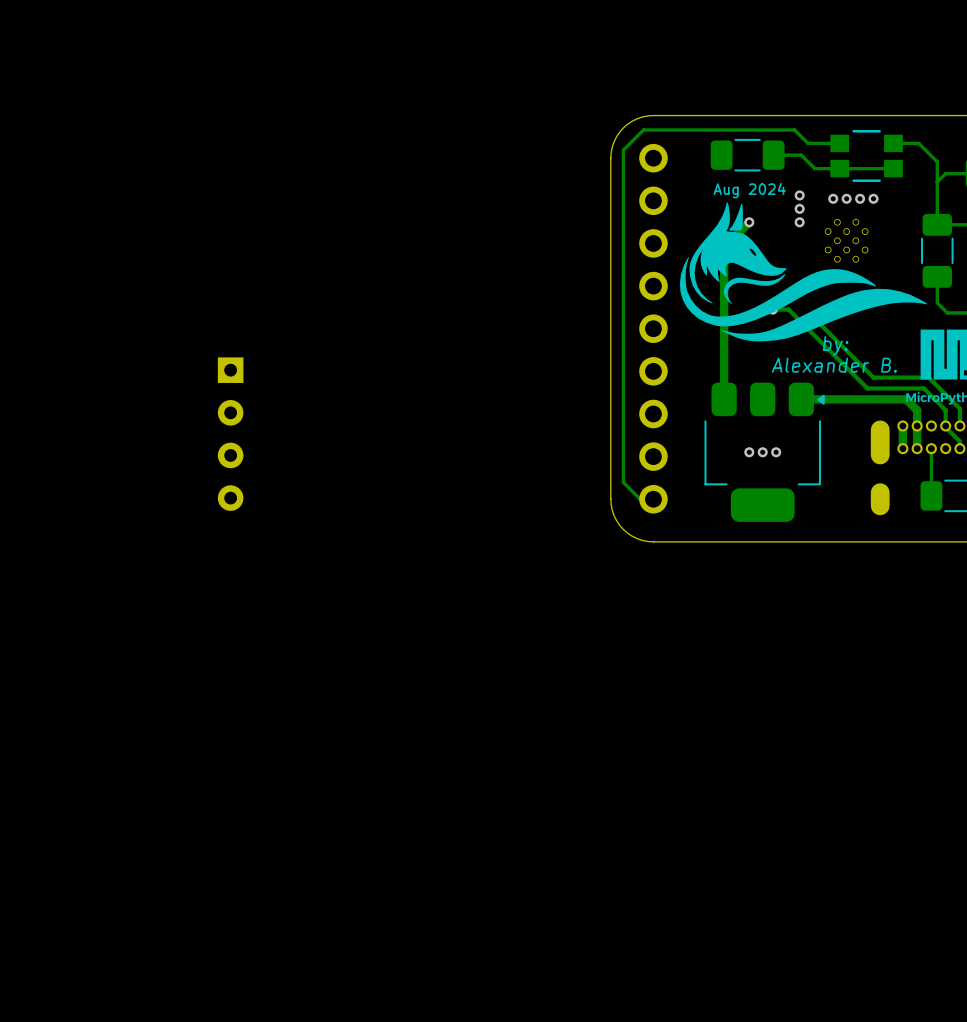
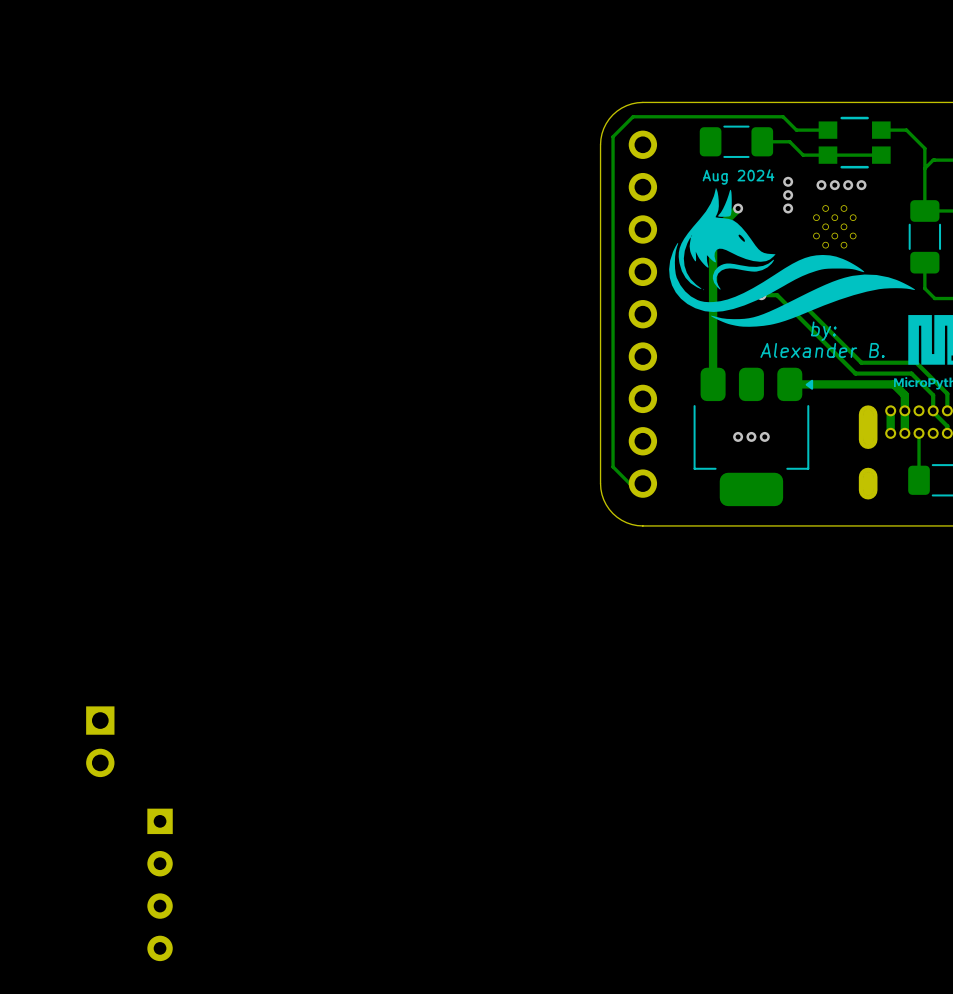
part: (230, 434) -> none
part: none -> (100, 741)
part: none -> (160, 884)

